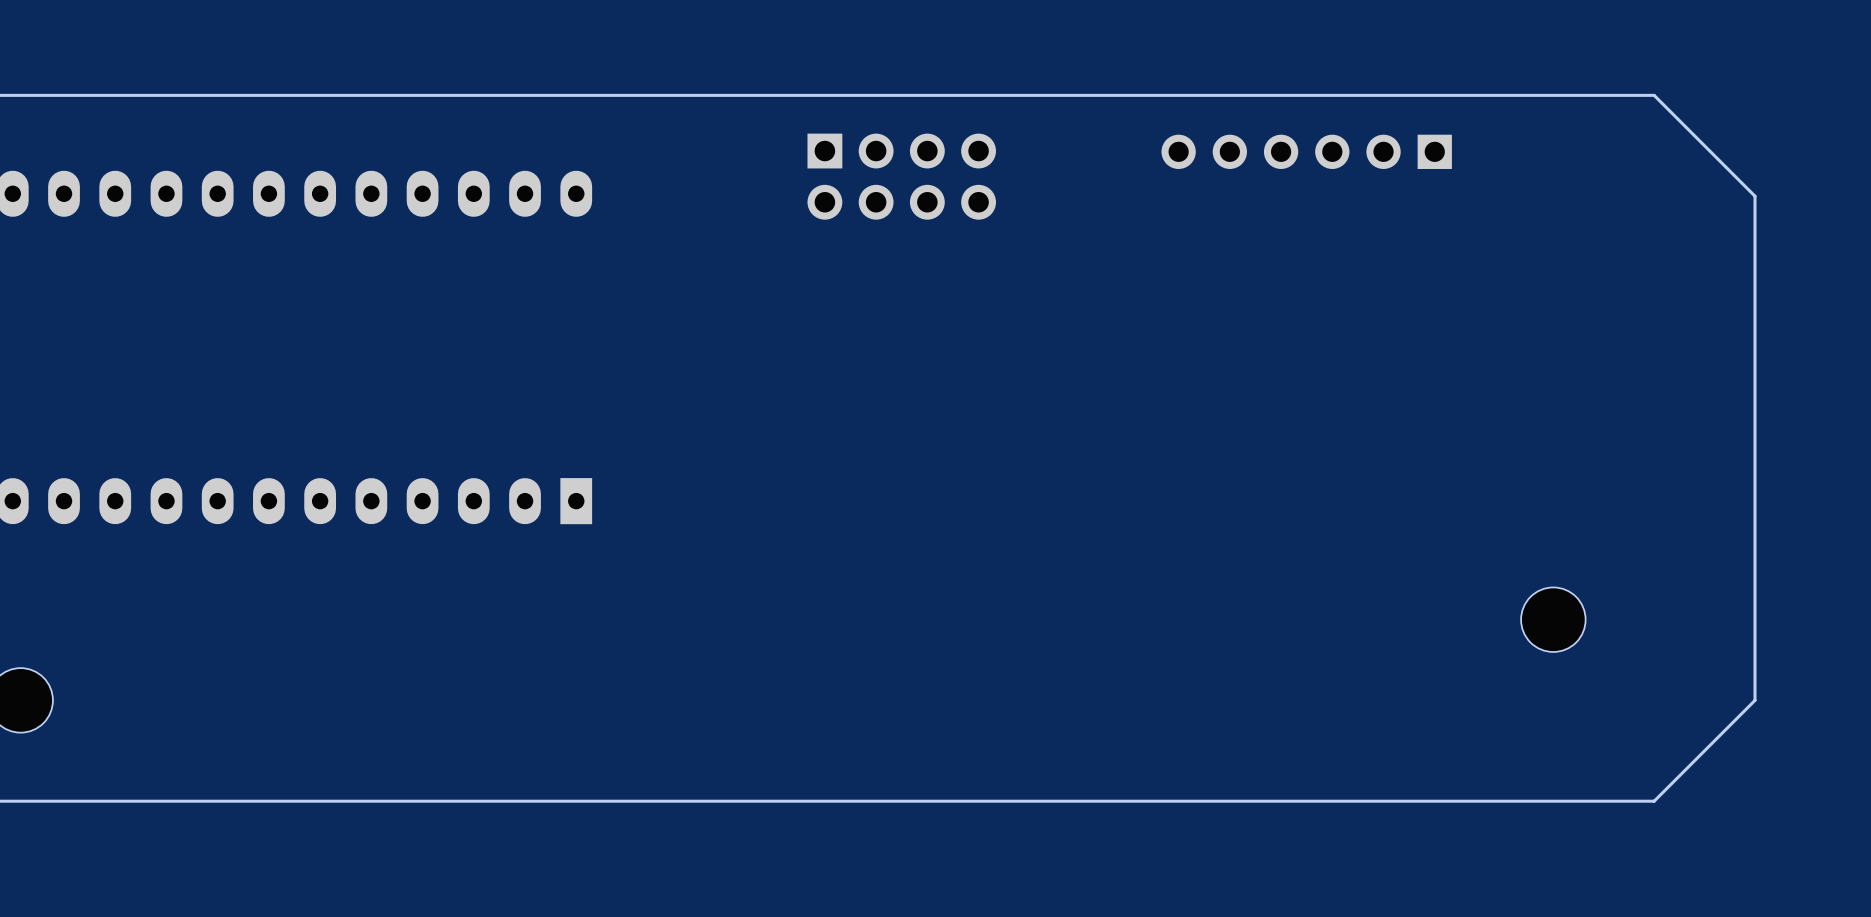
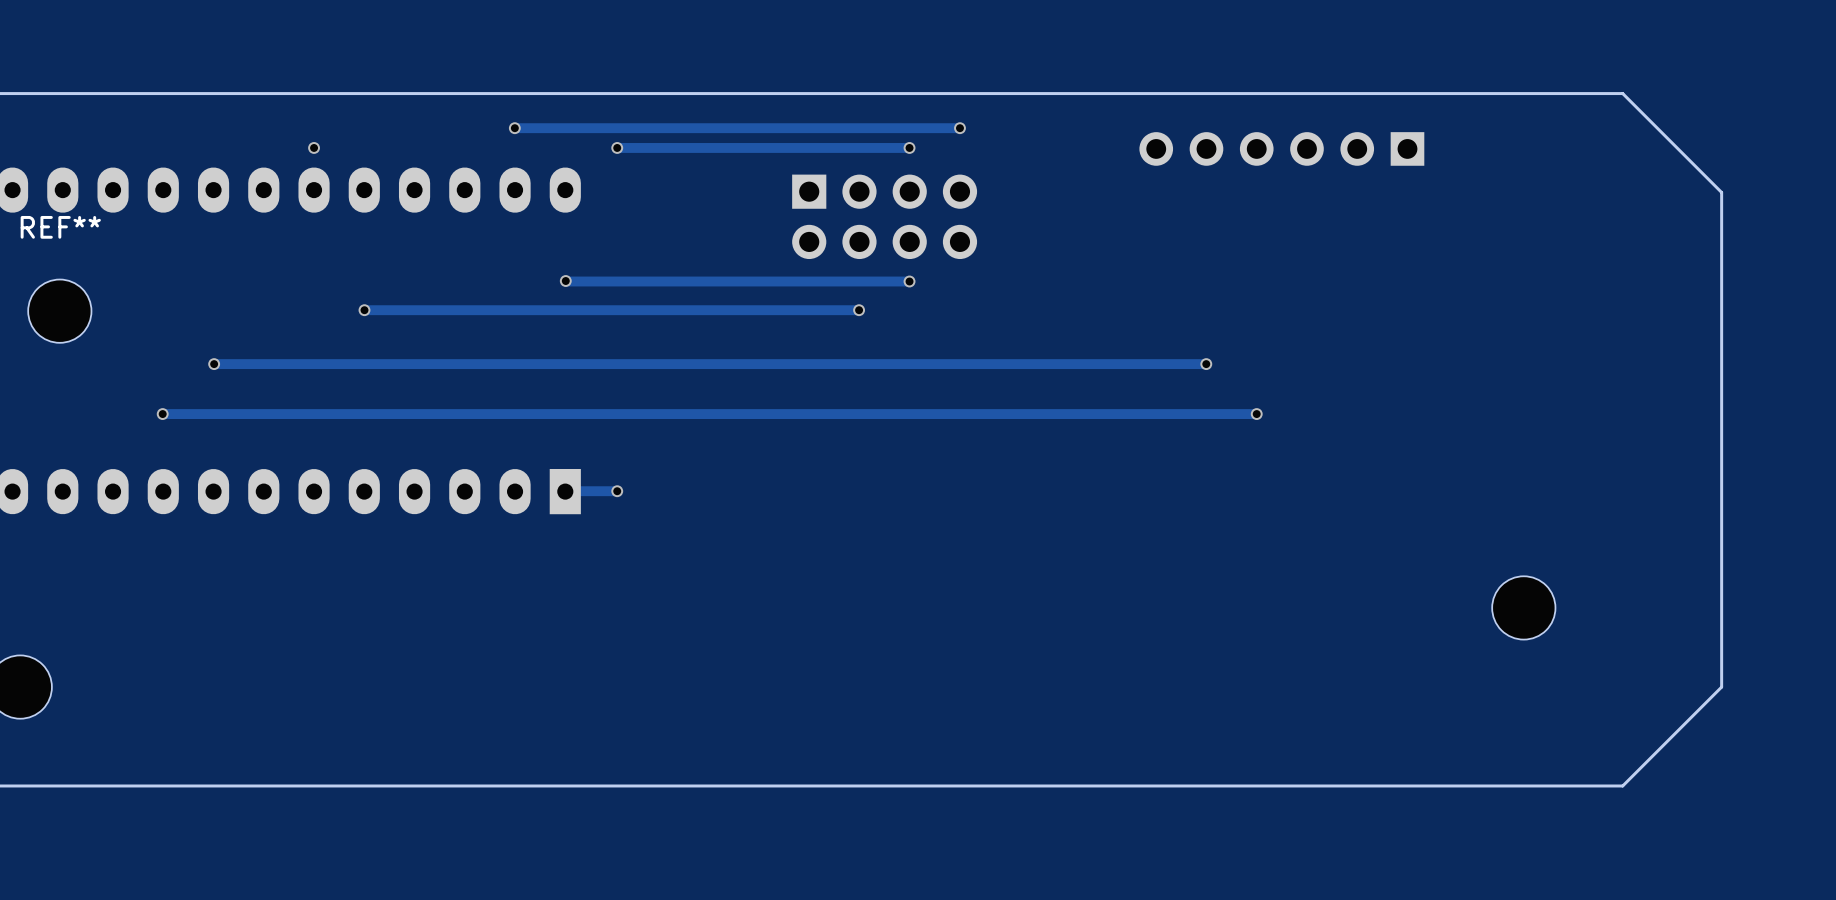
track: none -> (514, 128) (959, 128)
via: none -> (514, 128)
via: none -> (959, 128)
via: none -> (314, 147)
track: none -> (617, 147) (909, 147)
via: none -> (617, 147)
via: none -> (909, 147)
part position: (901, 176) -> (884, 216)
track: none -> (565, 281) (909, 281)
via: none -> (565, 281)
via: none -> (909, 281)
track: none -> (364, 310) (859, 310)
via: none -> (364, 310)
via: none -> (859, 310)
REF**: none -> (59, 311)
track: none -> (214, 364) (1206, 364)
via: none -> (214, 364)
via: none -> (1206, 364)
track: none -> (162, 414) (1256, 414)
via: none -> (162, 414)
via: none -> (1256, 414)
track: none -> (617, 491) (565, 491)
via: none -> (617, 491)

